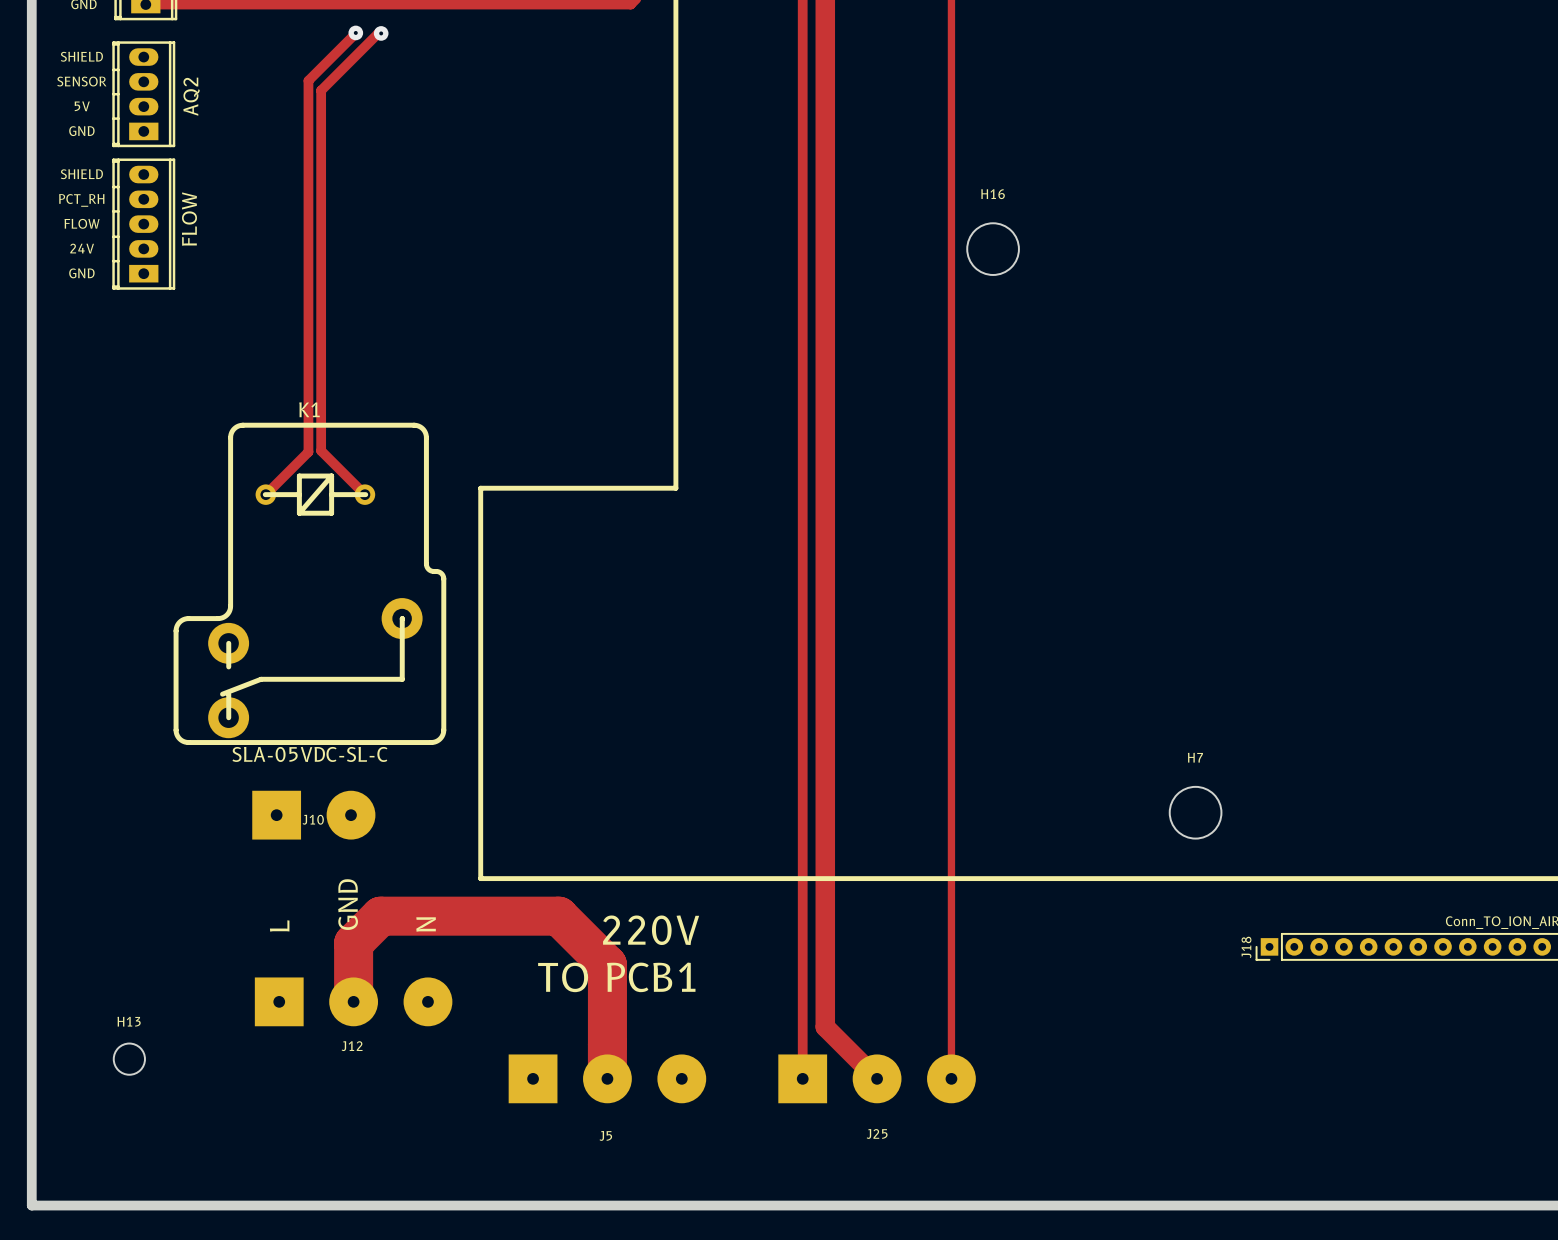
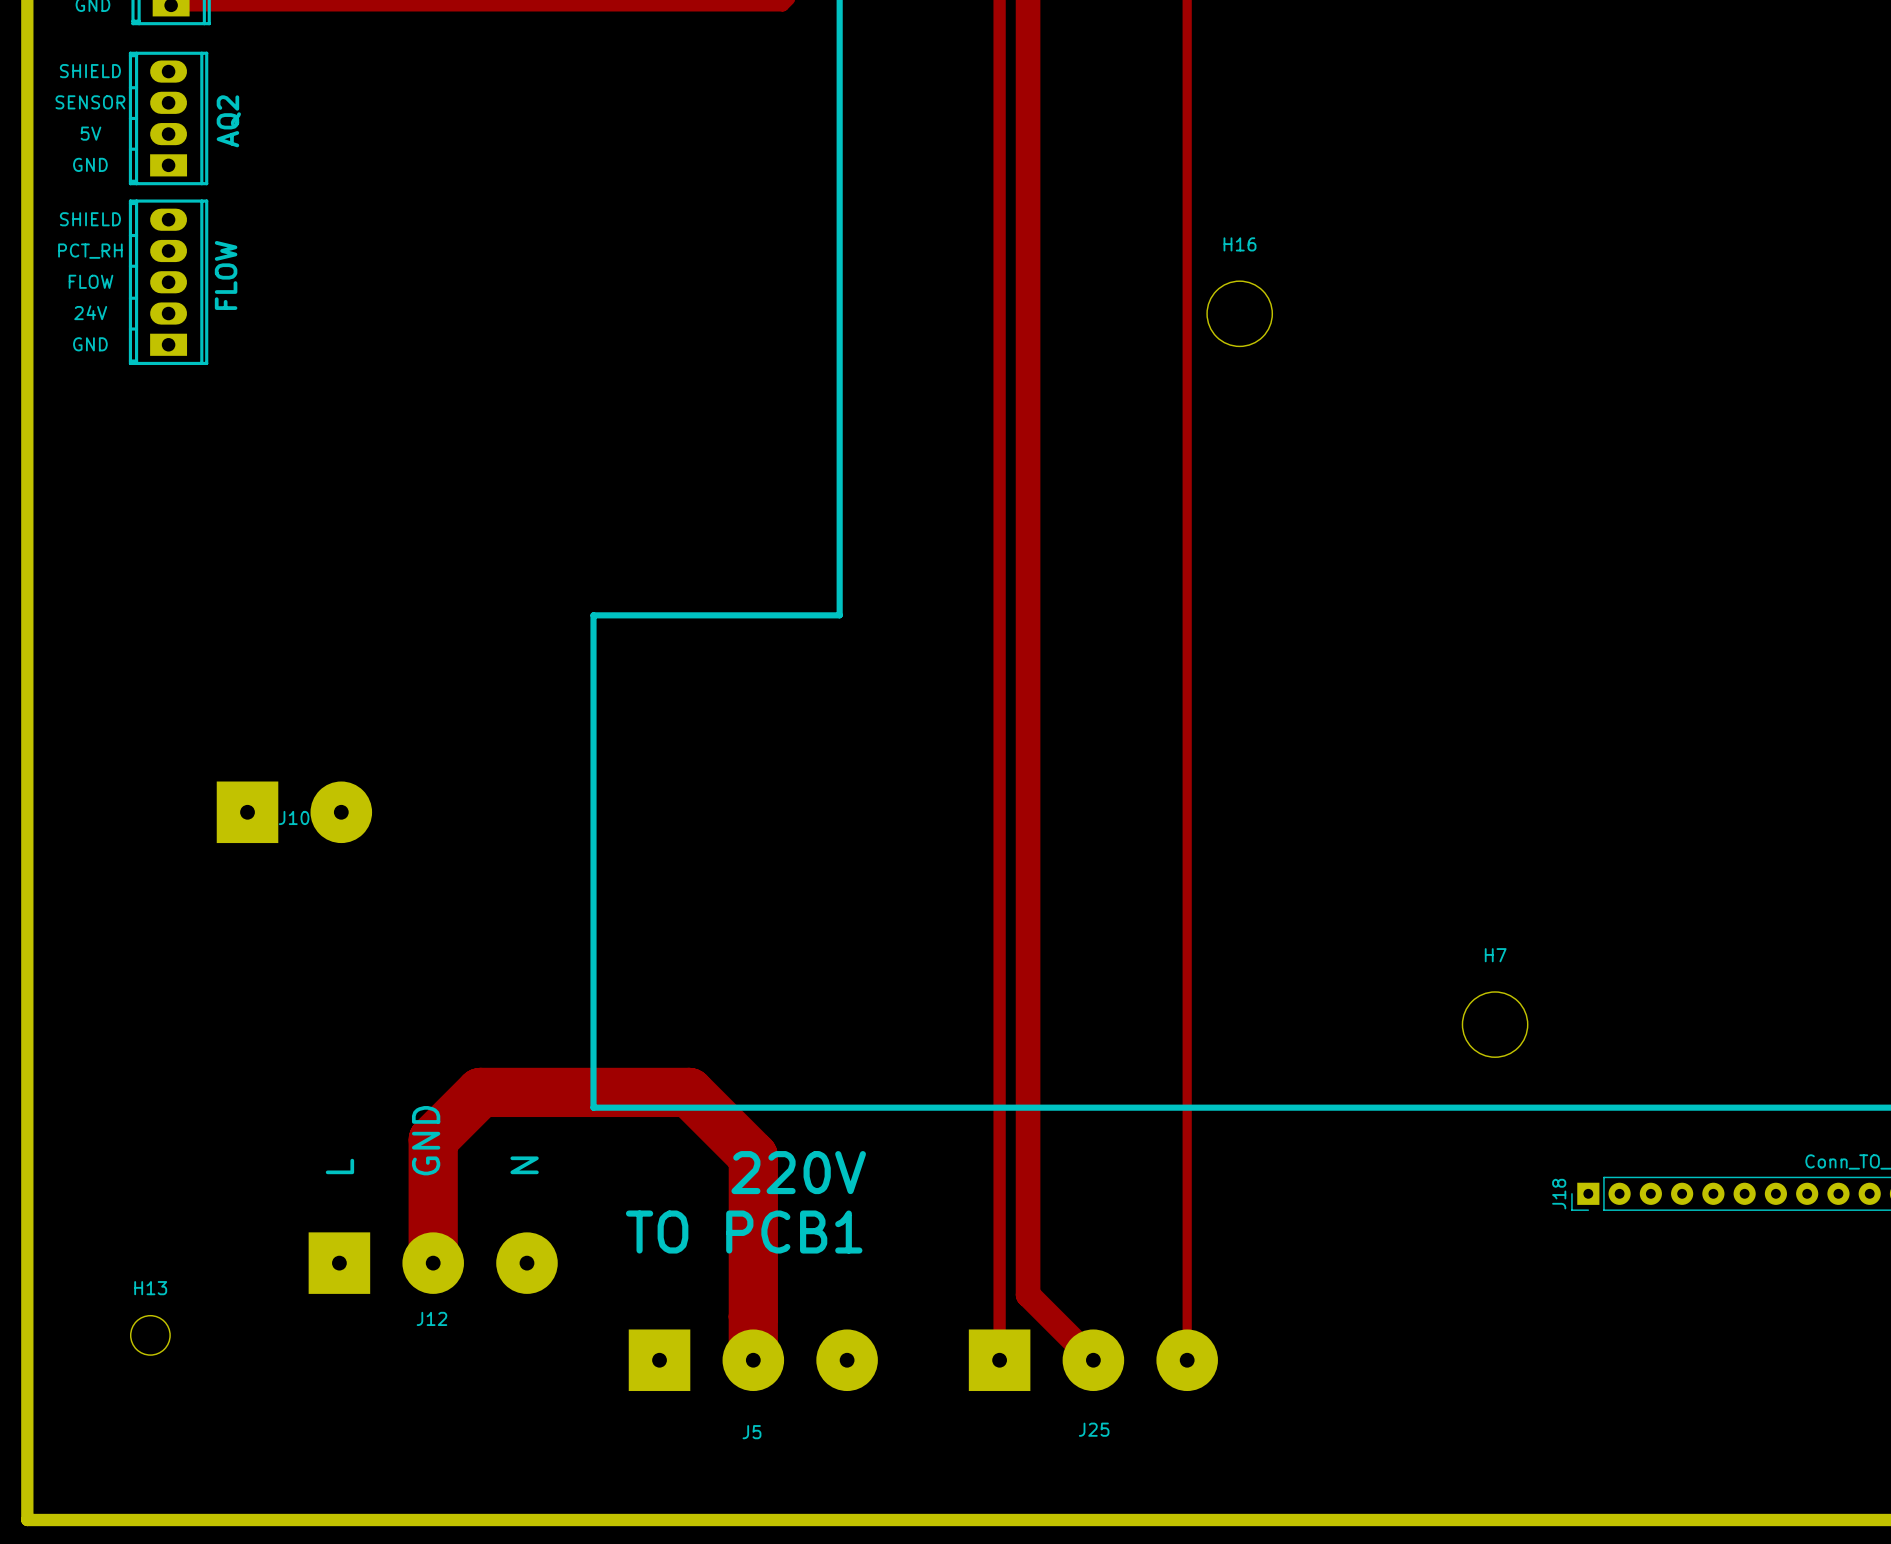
track: (355, 32) (308, 80) (308, 452) (265, 494) -> none
via: (355, 32) -> none
track: (381, 33) (378, 33) (321, 90) (321, 450) (364, 494) -> none
via: (381, 33) -> none
K1: SLA-05VDC-SL-C (309, 583) -> none
J10 position: (313, 815) -> (294, 812)
track: (353, 943) (380, 916) (558, 916) (607, 964) -> (433, 1189) (433, 1139) (480, 1092) (689, 1092) (753, 1156) (753, 1216)

